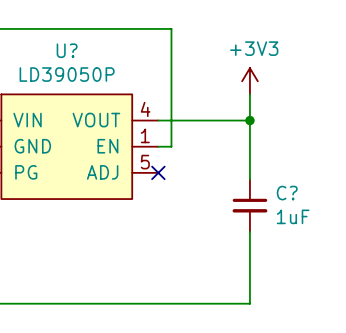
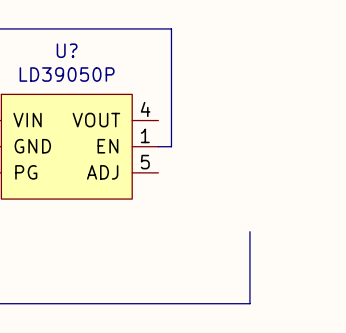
power symbol: +3V3 (249, 81) -> none
wire: (249, 94) (249, 179) -> none
wire: (158, 120) (249, 120) -> none
junction: (249, 120) -> none
no-connect mark: (158, 172) -> none
C?: 1uF (249, 205) -> none

